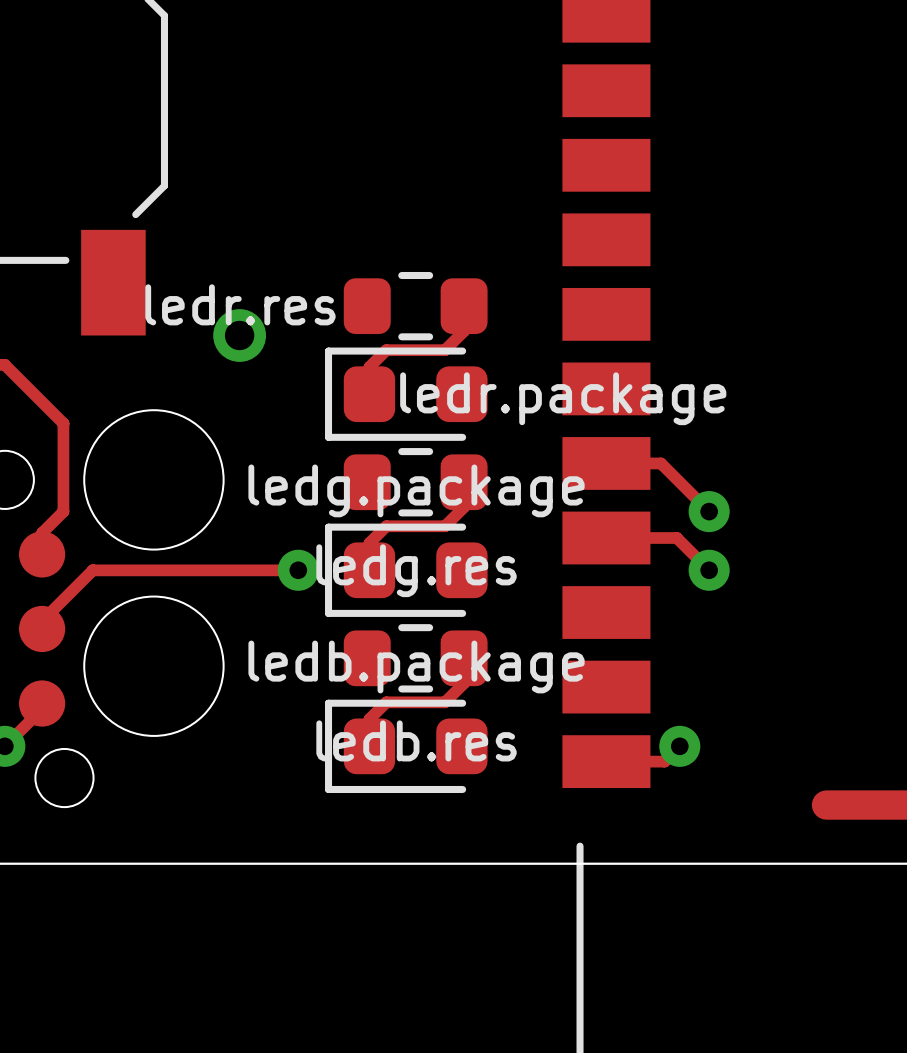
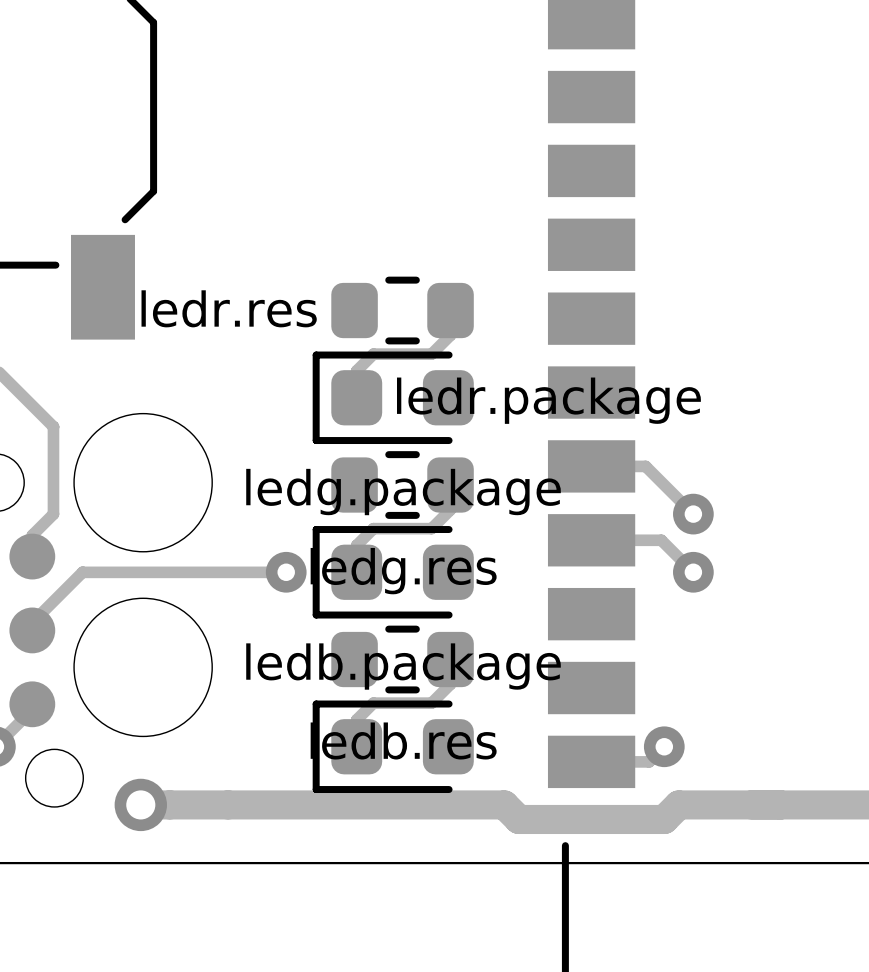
via: (239, 335) -> none
track: none -> (140, 804) (504, 804) (518, 819) (664, 819) (678, 804) (809, 804)
via: none -> (140, 804)

